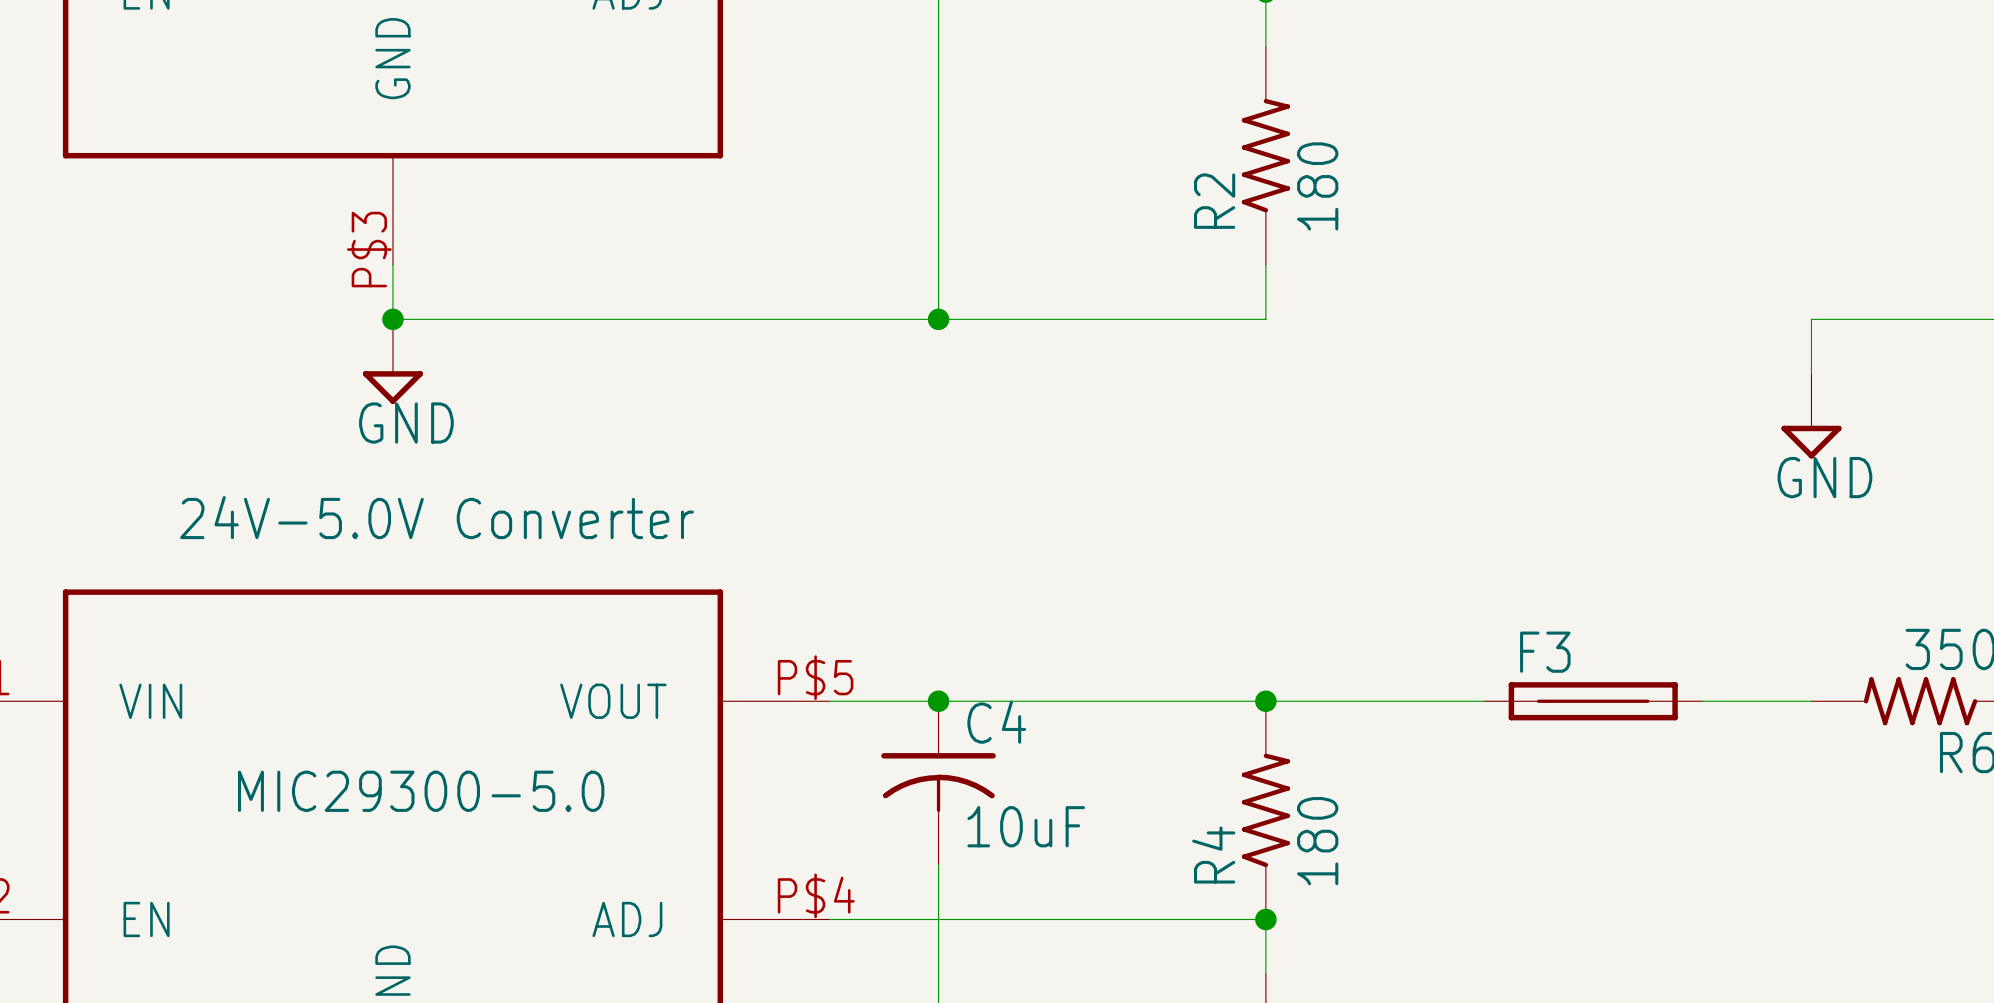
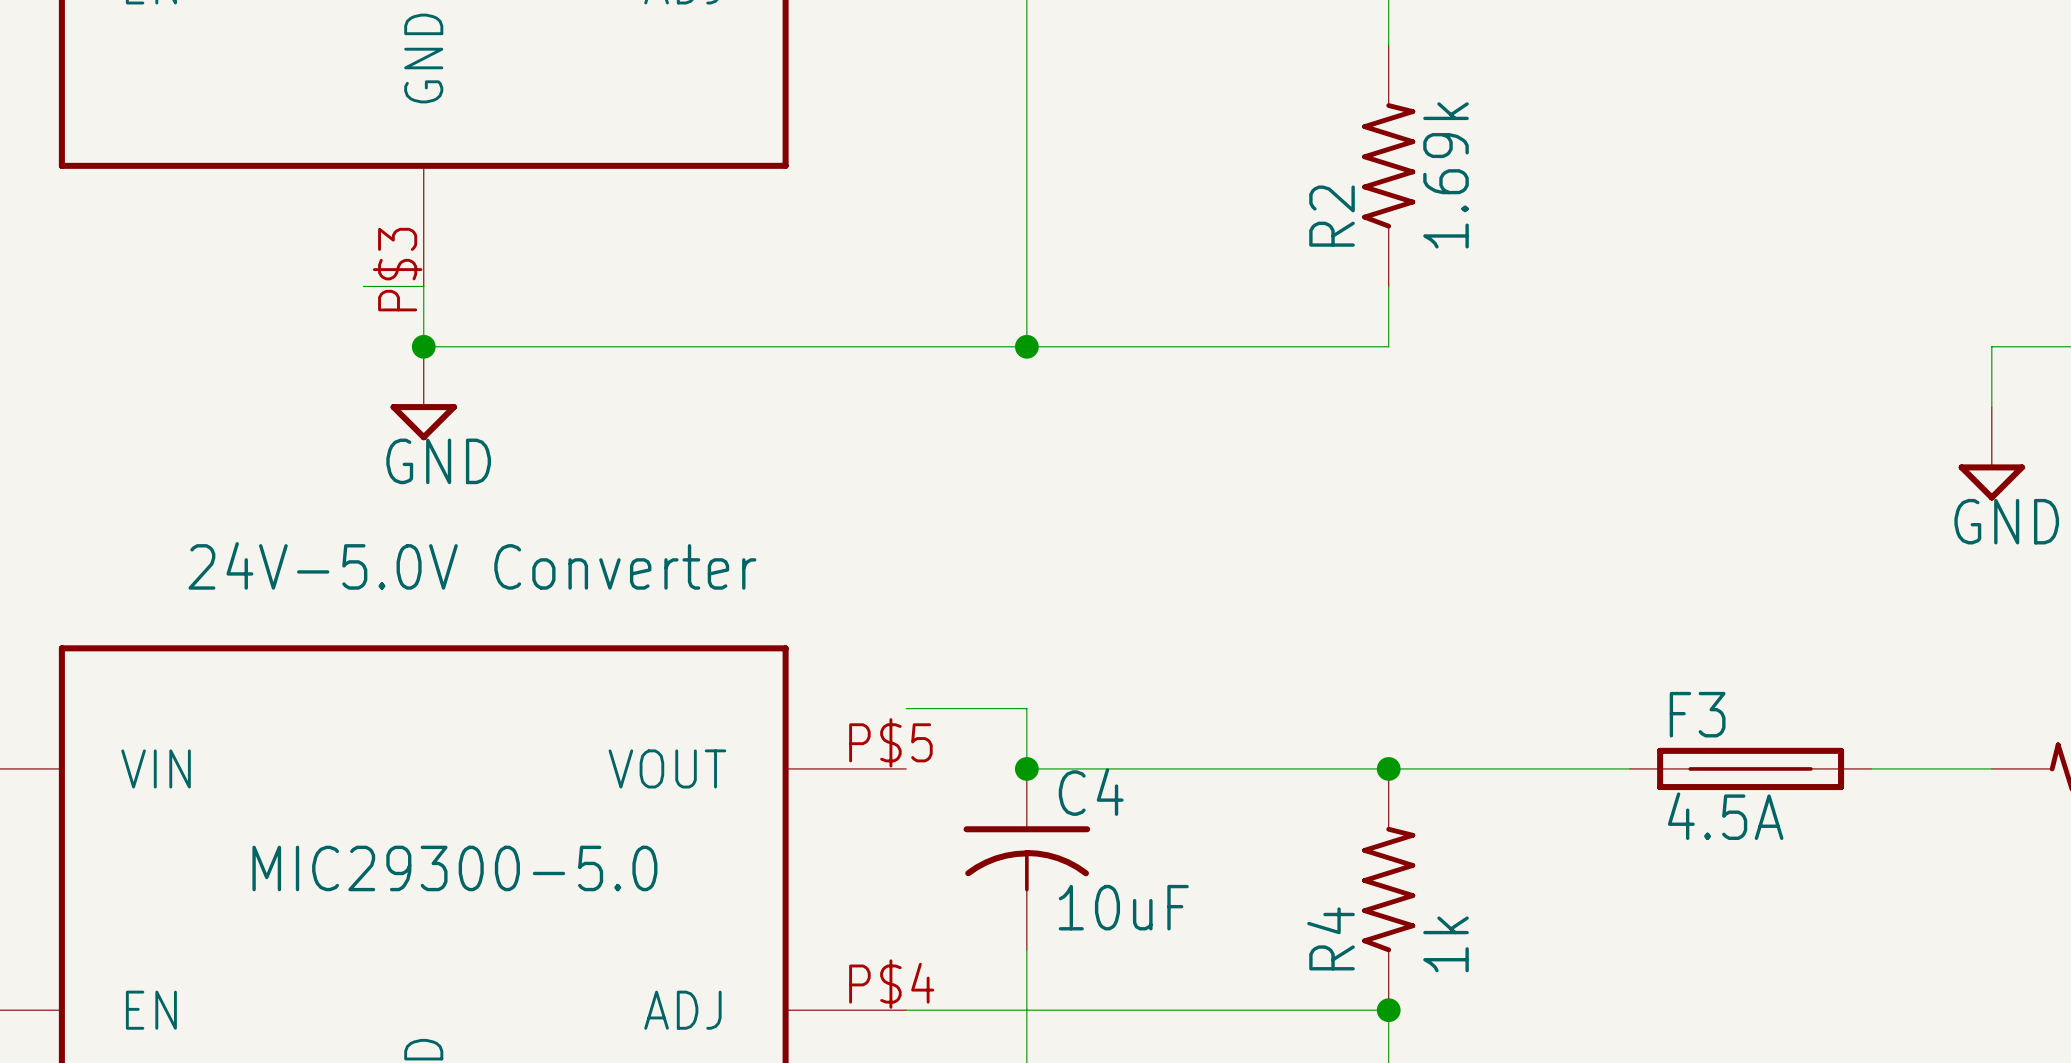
R2 value: 180 (1317, 186) -> 1.69k (1446, 175)
wire: none -> (363, 286) (423, 286)
wire: (829, 701) (938, 701) -> (906, 708) (1026, 708) (1026, 768)
F3 value: none -> 4.5A (1725, 816)
R4 value: 180 (1317, 841) -> 1k (1446, 944)

